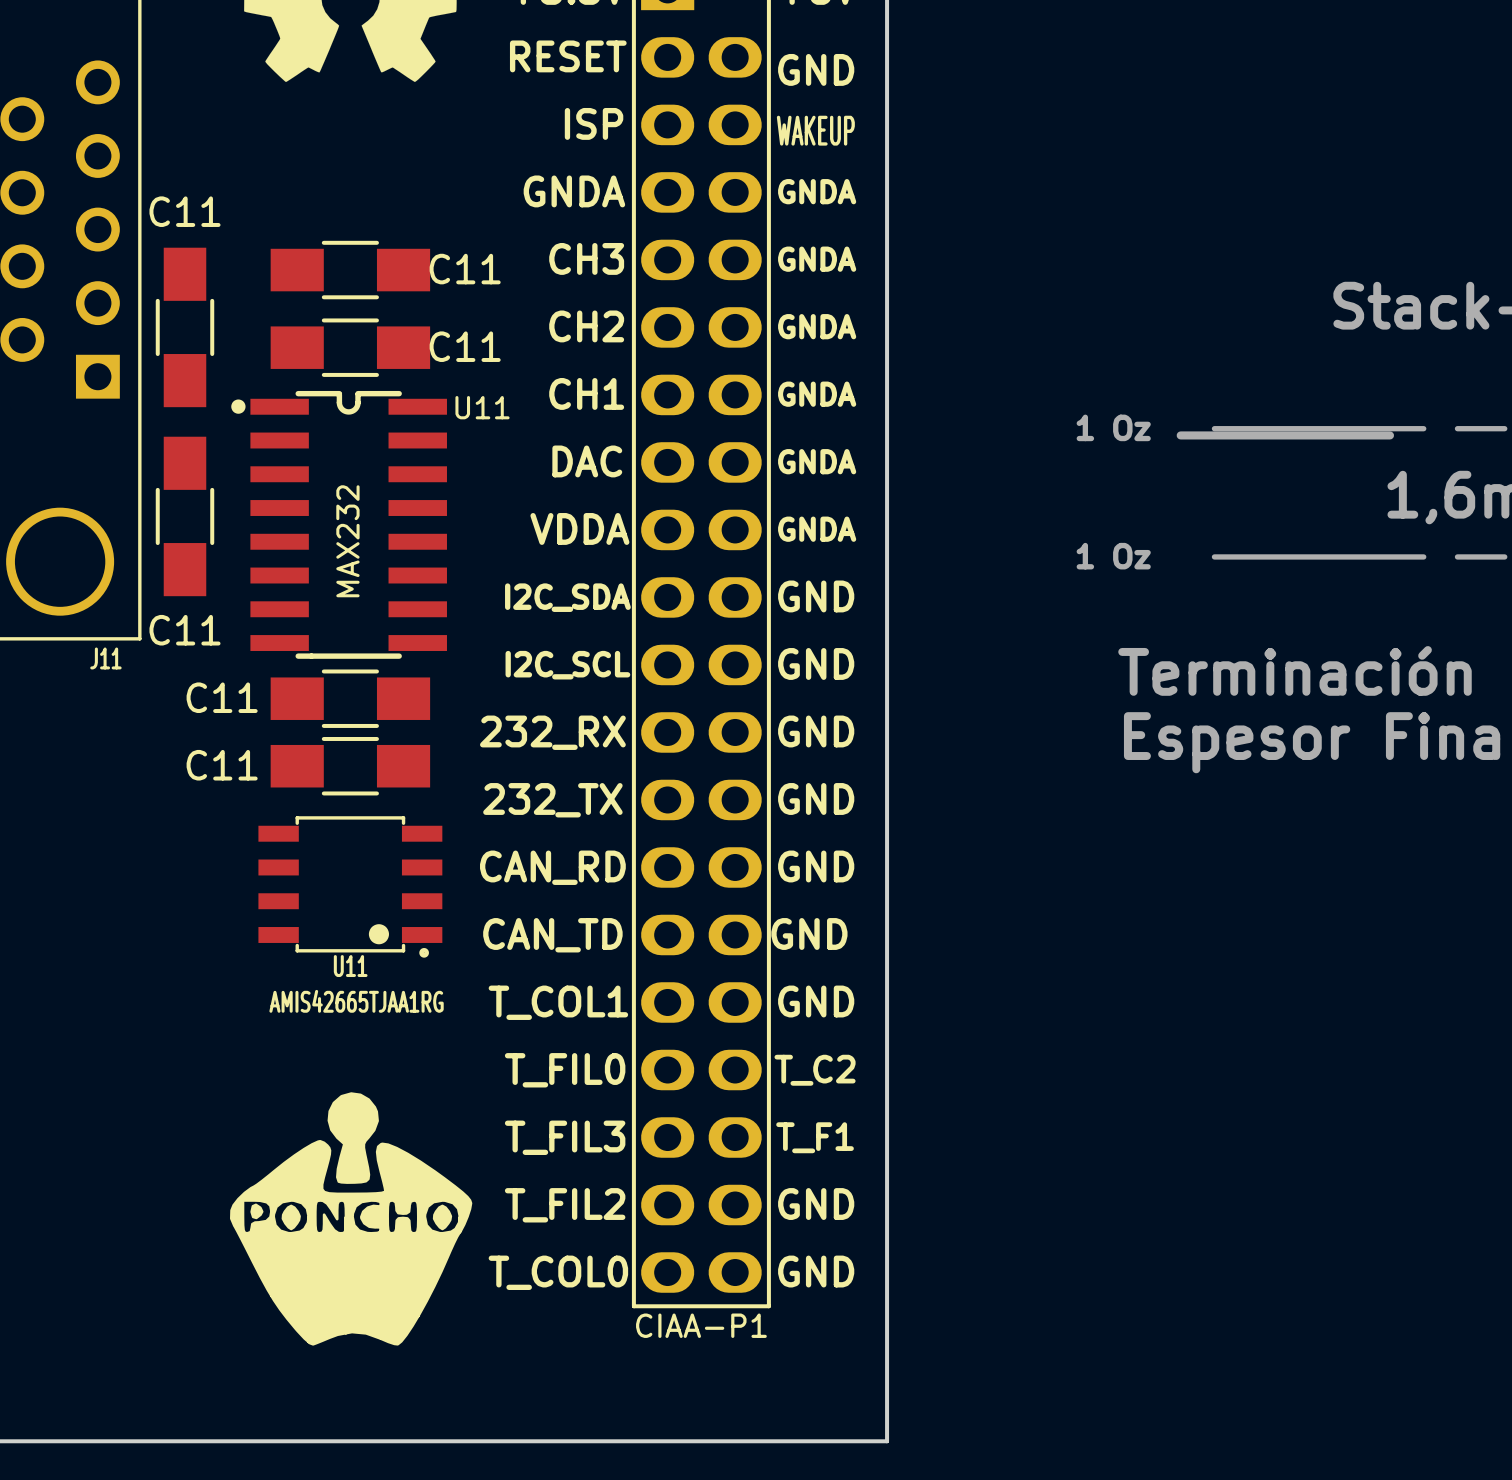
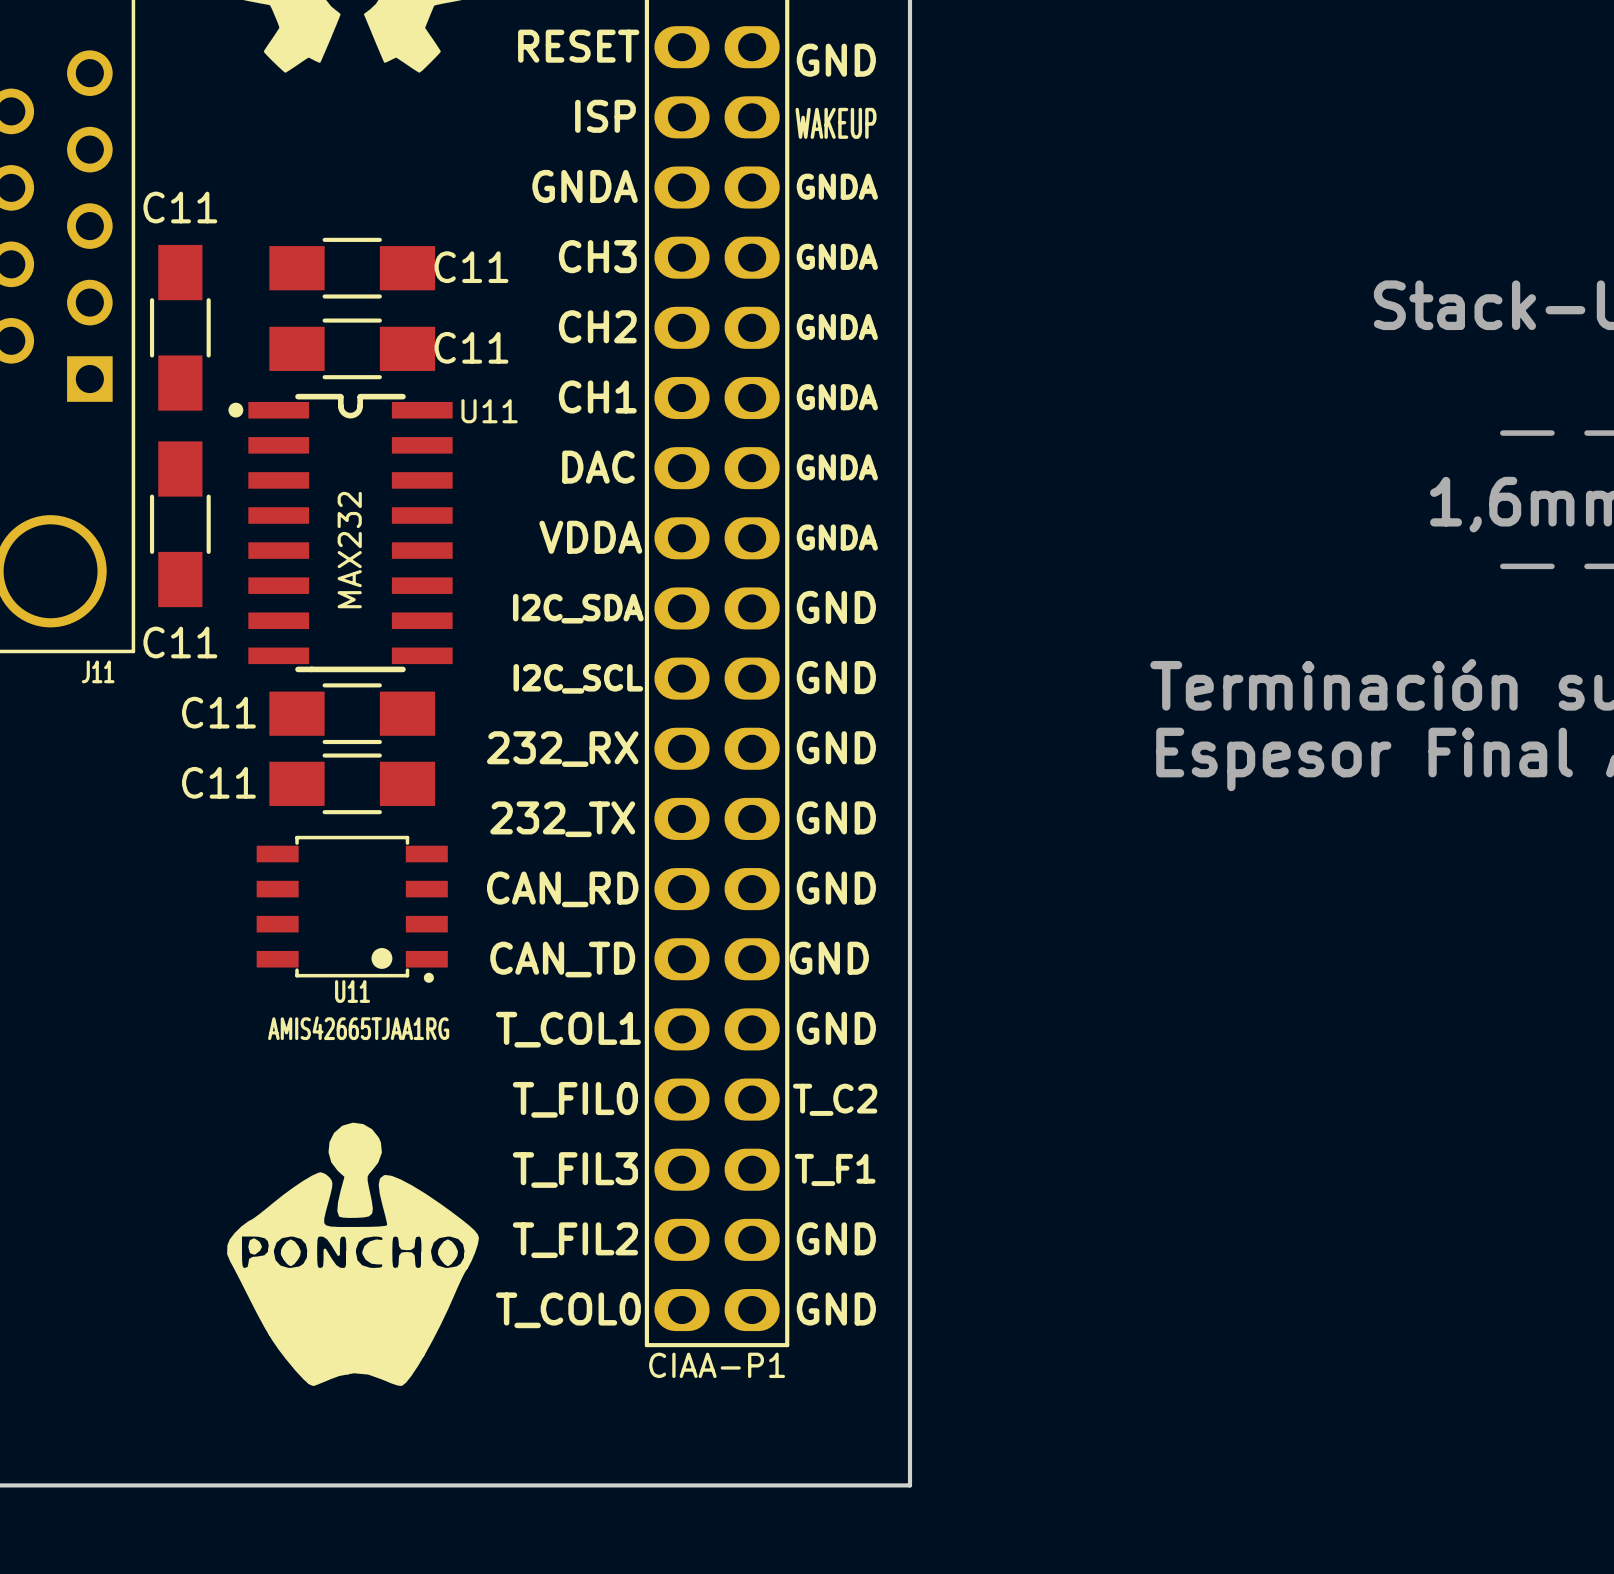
text: 1 Oz (1113, 427) -> none
line: (1214, 428) (1423, 428) -> none
line: (1180, 435) (1389, 435) -> none
text: 1 Oz (1113, 556) -> none
line: (1214, 556) (1423, 556) -> none

